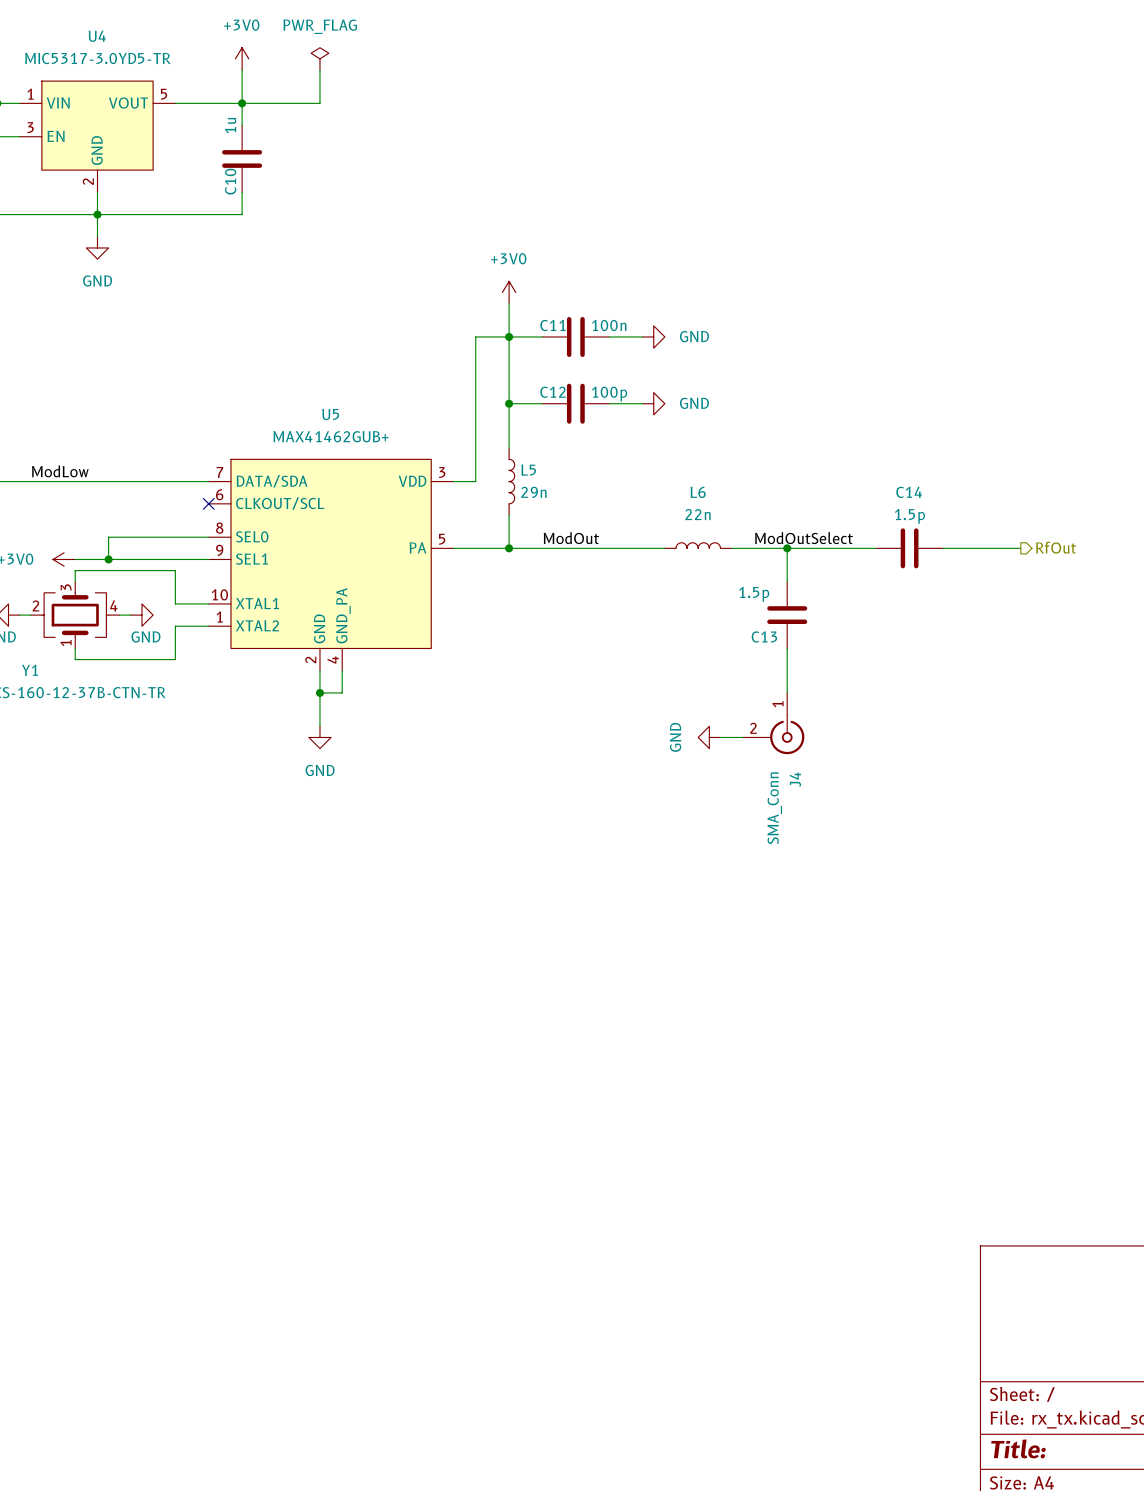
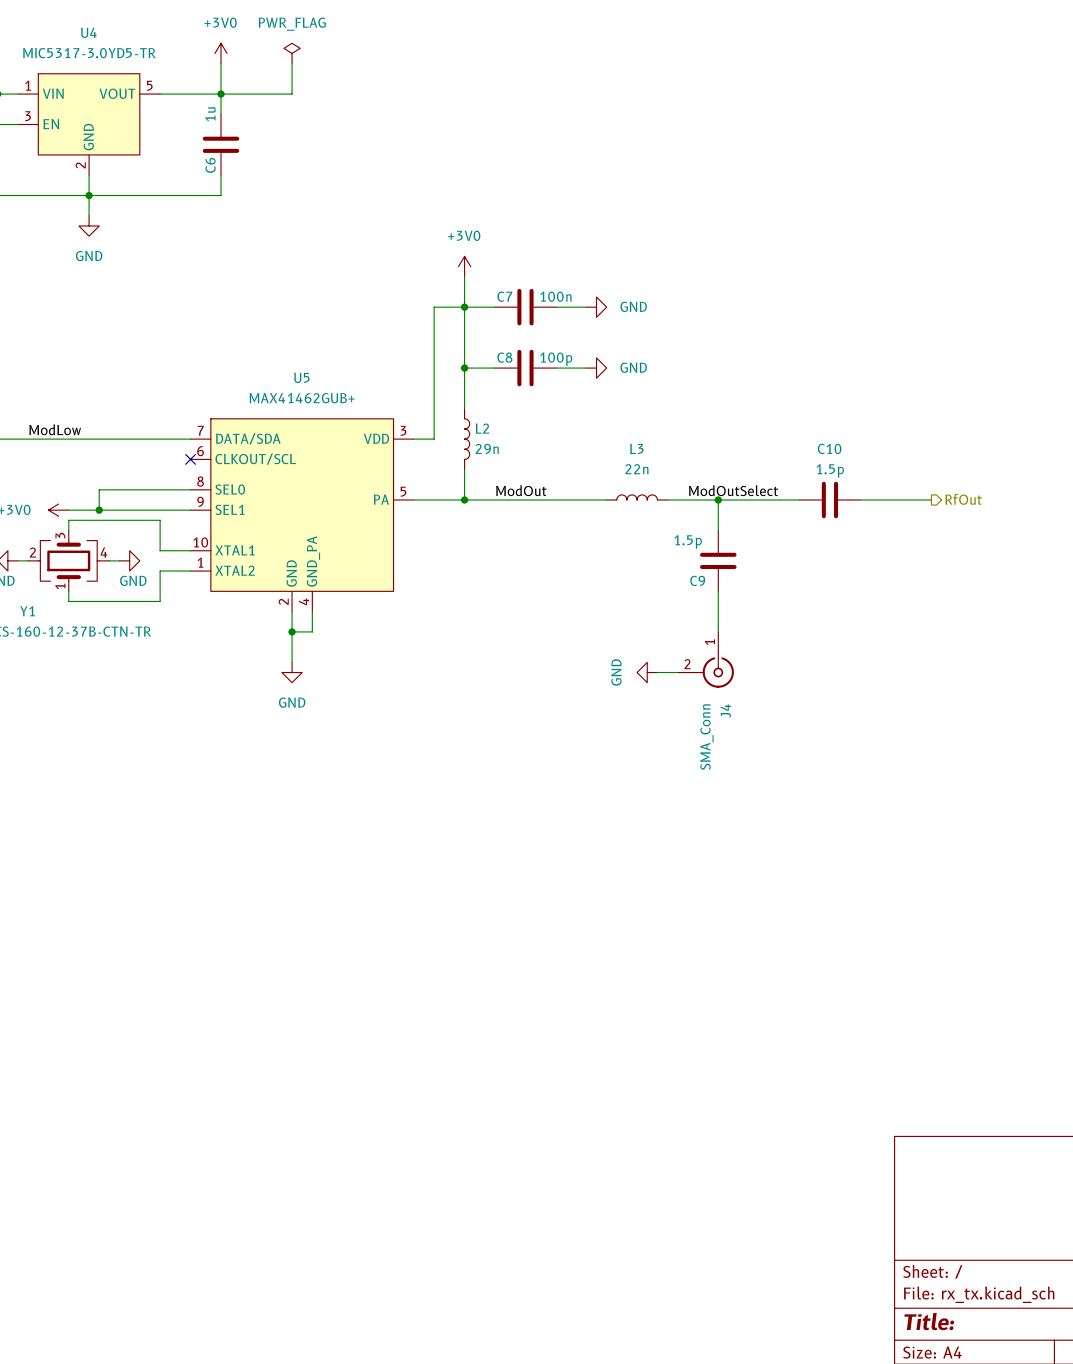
C10 name: C10 (230, 181) -> C6 (210, 165)
C11 name: C11 (553, 325) -> C7 (504, 296)
C12 name: C12 (553, 392) -> C8 (504, 357)
L5 name: L5 (528, 470) -> L2 (482, 428)
L6 name: L6 (698, 492) -> L3 (636, 448)
C14 name: C14 (909, 492) -> C10 (829, 448)
C13 name: C13 (764, 636) -> C9 (697, 580)

